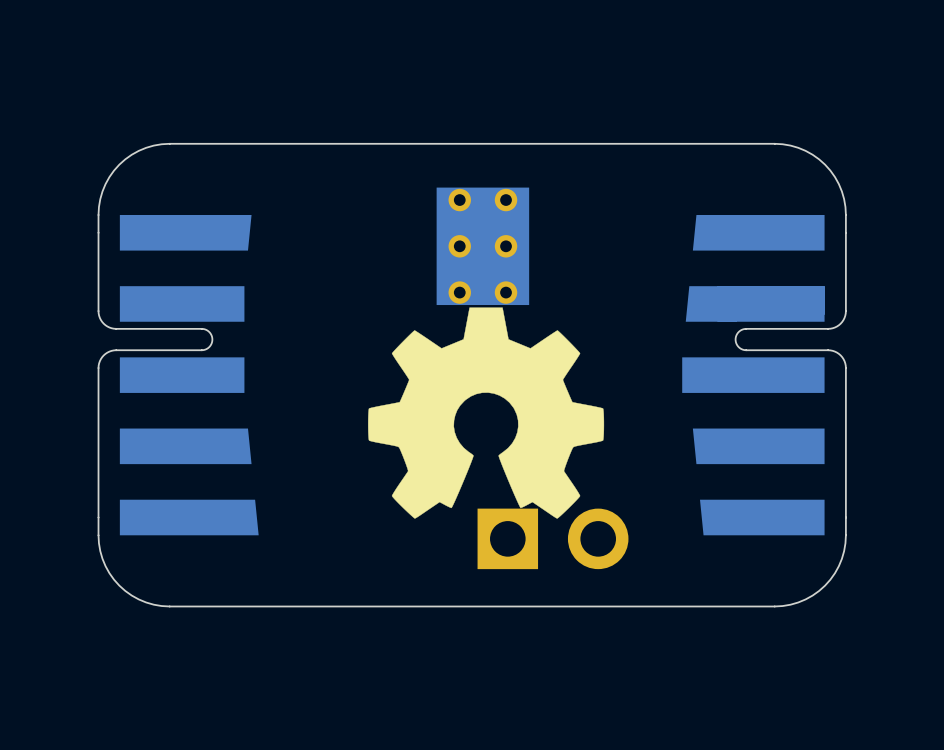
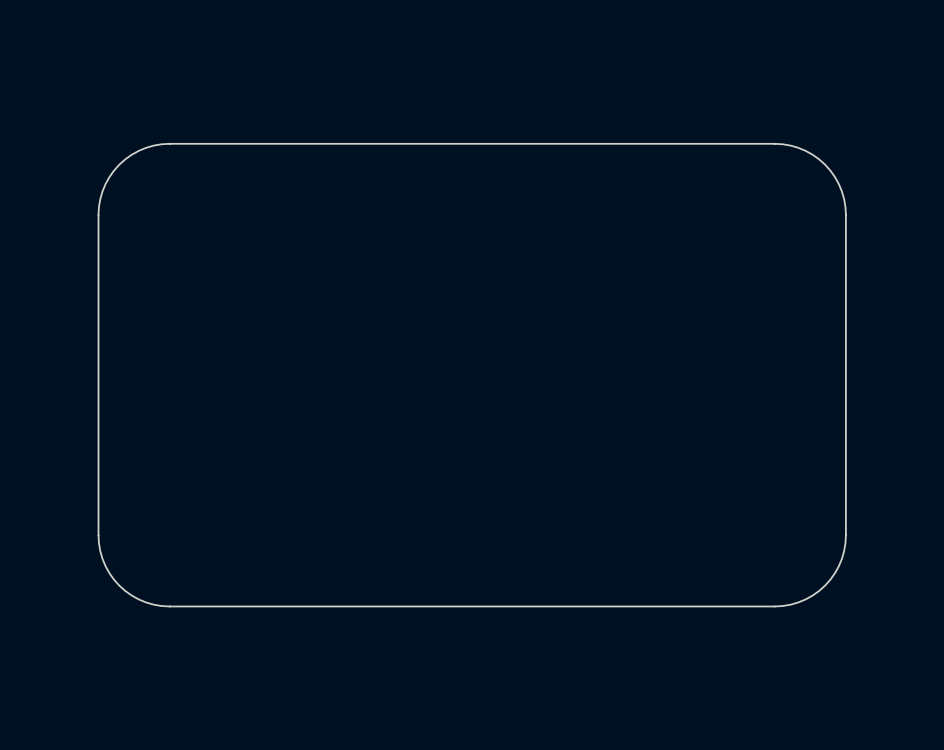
board edge: none -> (98, 232) (98, 517)
board edge: none -> (845, 232) (845, 517)
part: (482, 246) -> none
drawing: [368, 307, 605, 519] -> none
part: (178, 375) -> none
part: (764, 375) -> none
part: (553, 538) -> none

